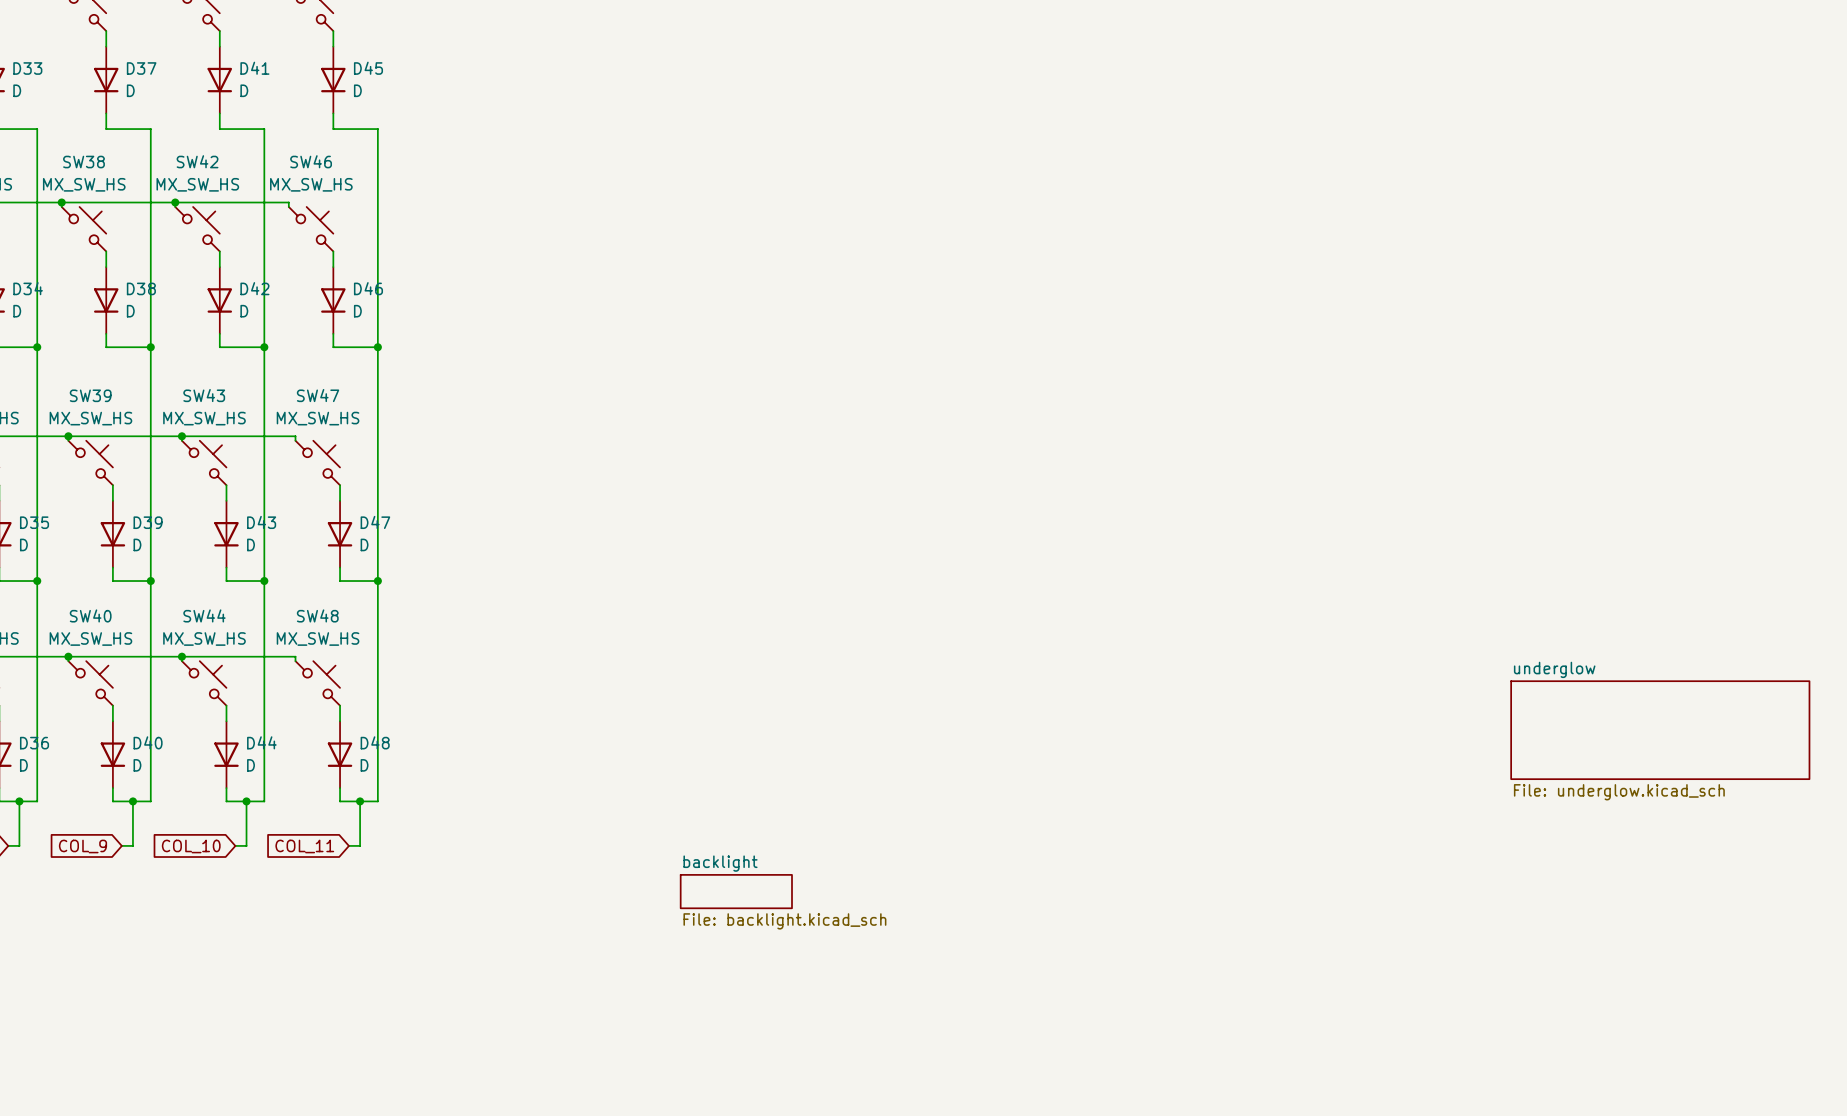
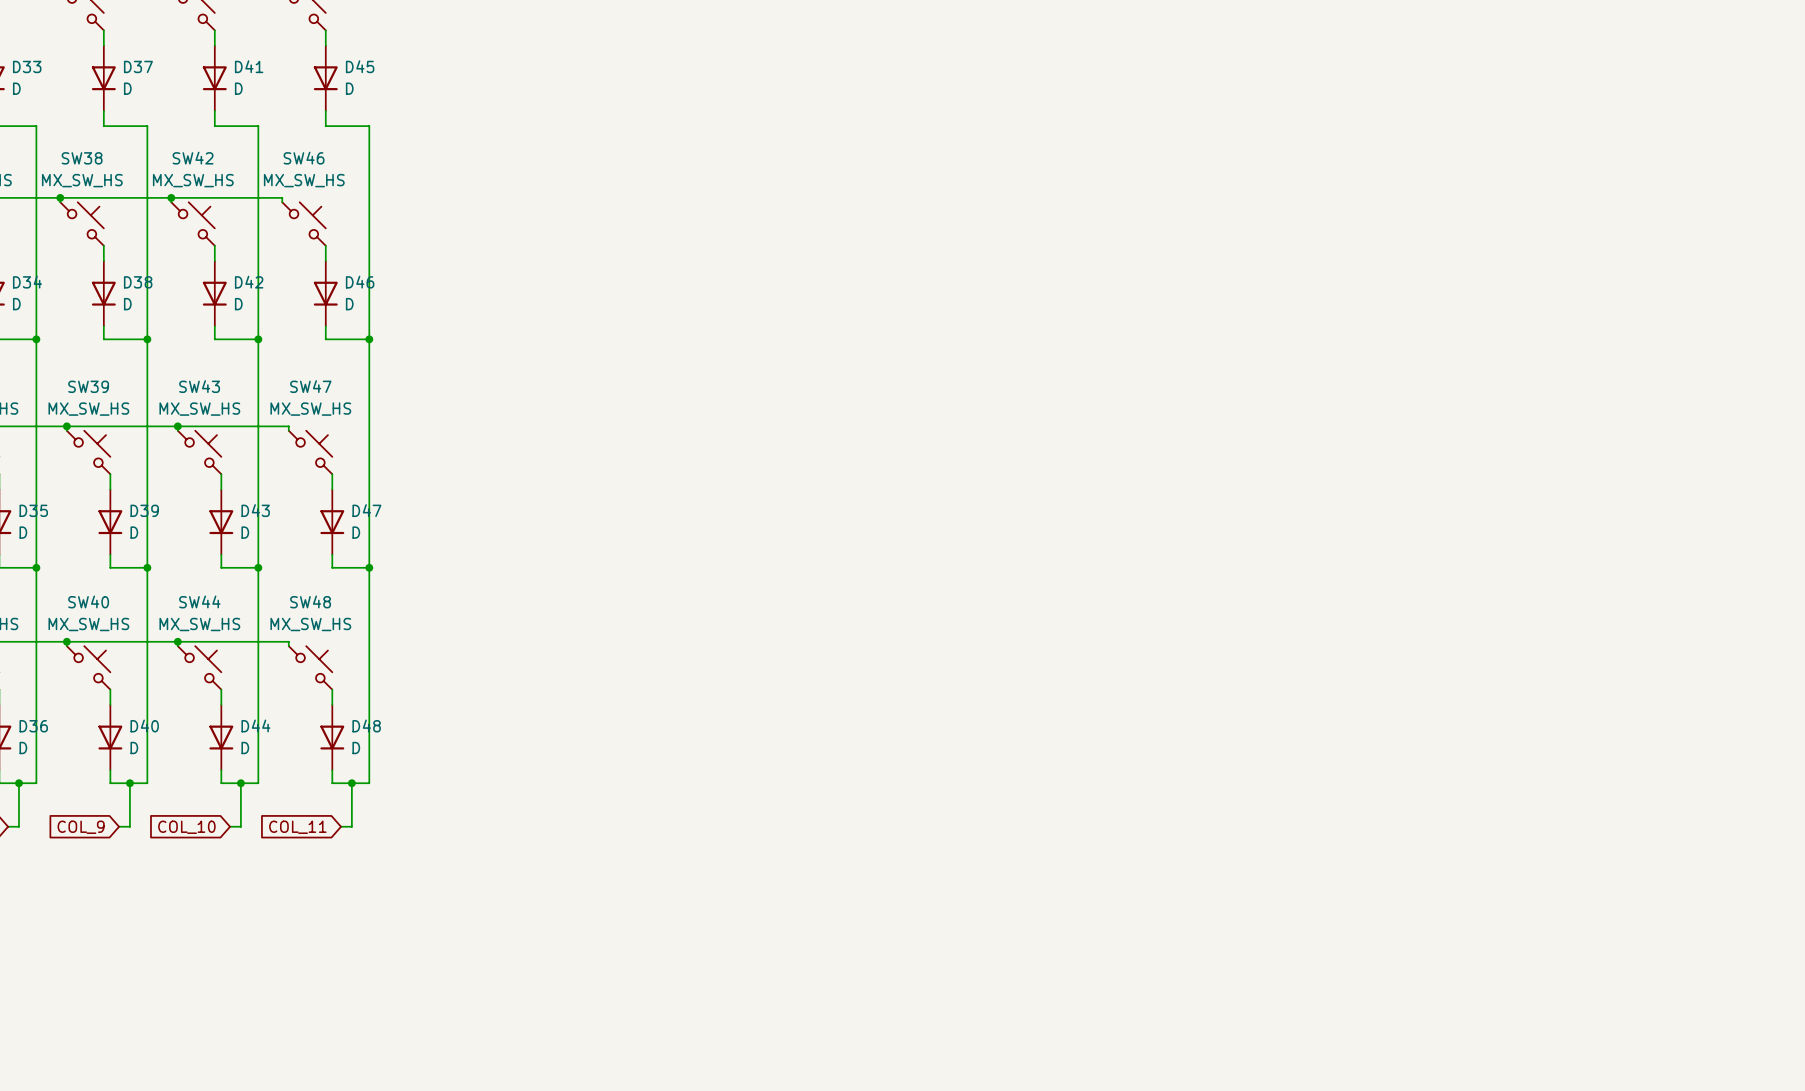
sheet underglow: File: underglow.kicad_sch (1660, 730) -> none
sheet backlight: File: backlight.kicad_sch (736, 891) -> none

